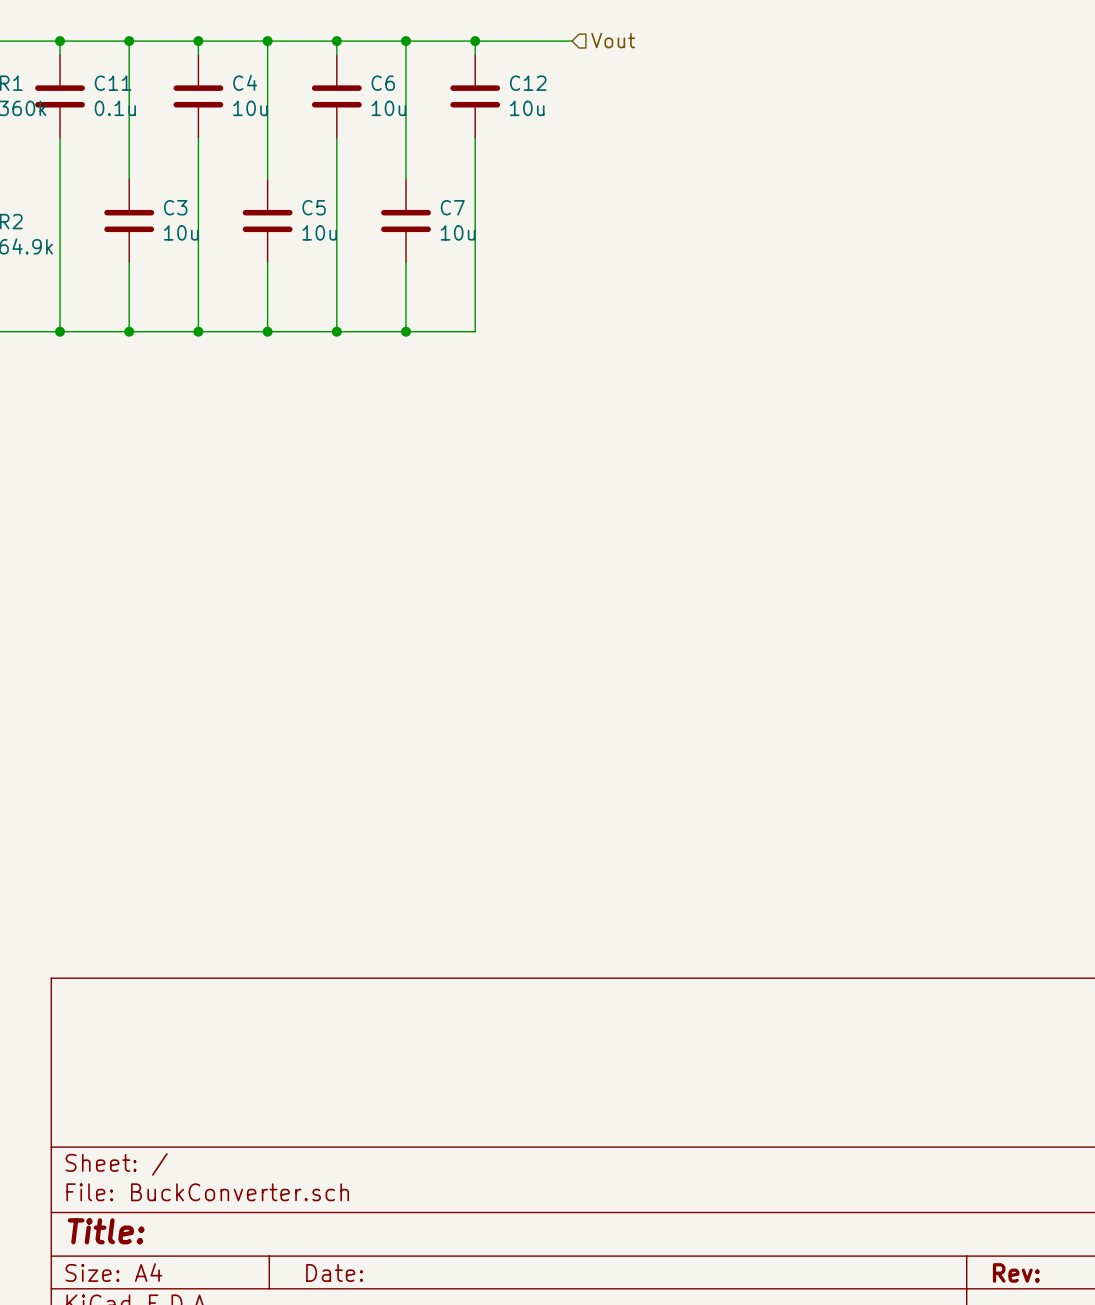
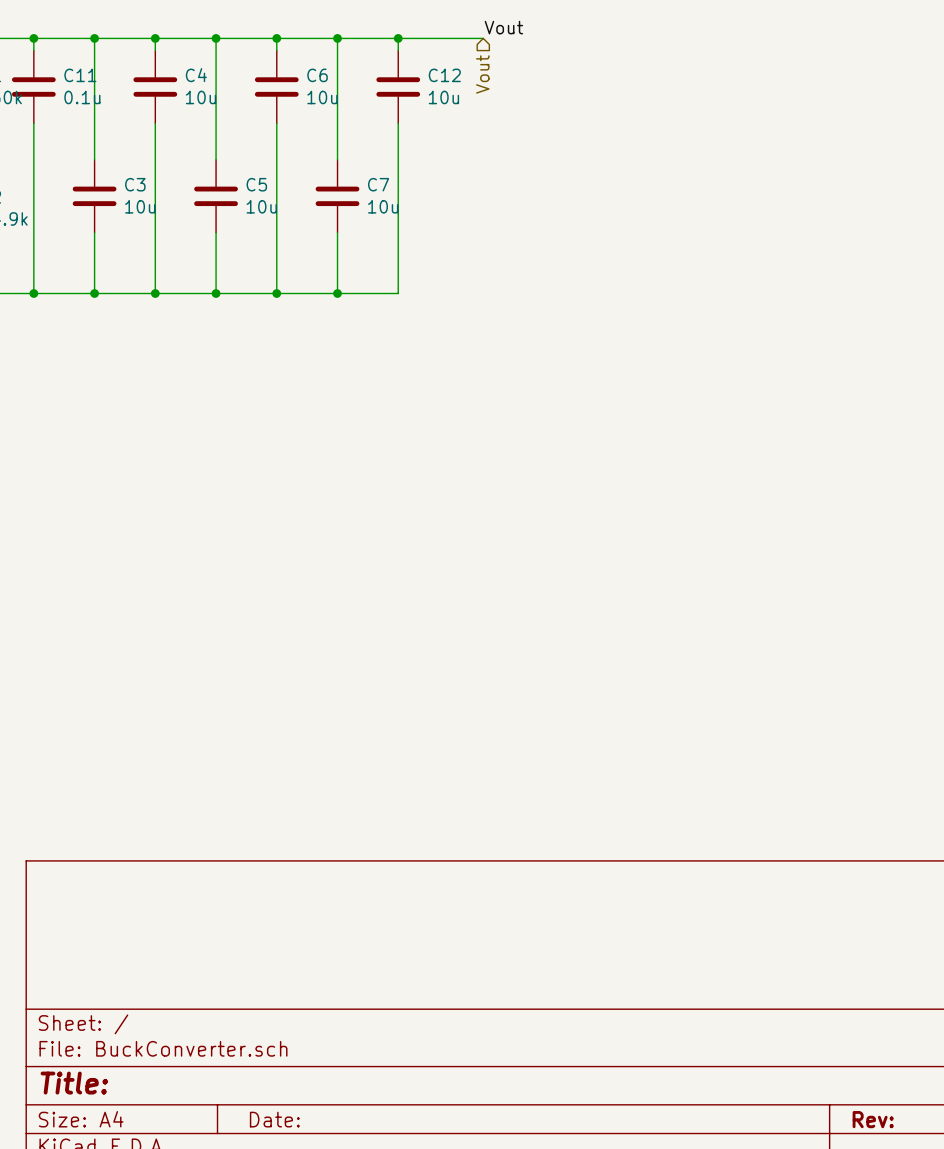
label: none -> Vout (503, 27)
hierarchical label rotation: 0° (613, 40) -> 90° clockwise (482, 74)
hierarchical label position: Vout (613, 40) -> Vout (482, 74)

